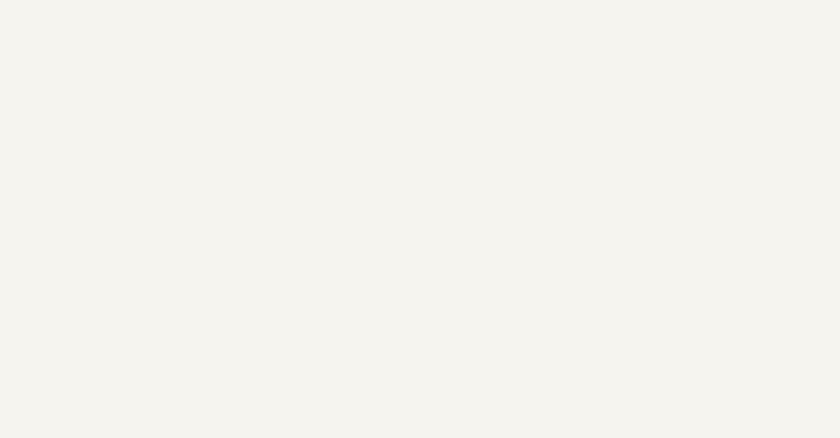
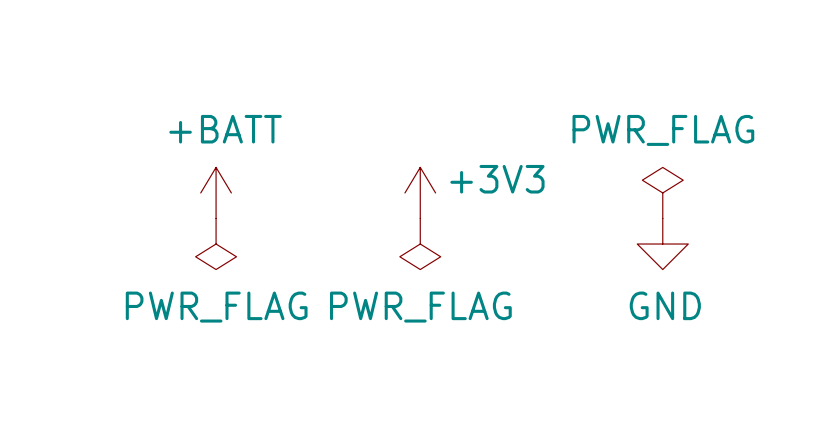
power symbol: none -> +BATT (216, 192)
power symbol: none -> +3V3 (420, 192)
power symbol: none -> PWR_FLAG (662, 192)
power symbol: none -> PWR_FLAG (216, 244)
power symbol: none -> PWR_FLAG (420, 244)
power symbol: none -> GND (662, 244)

